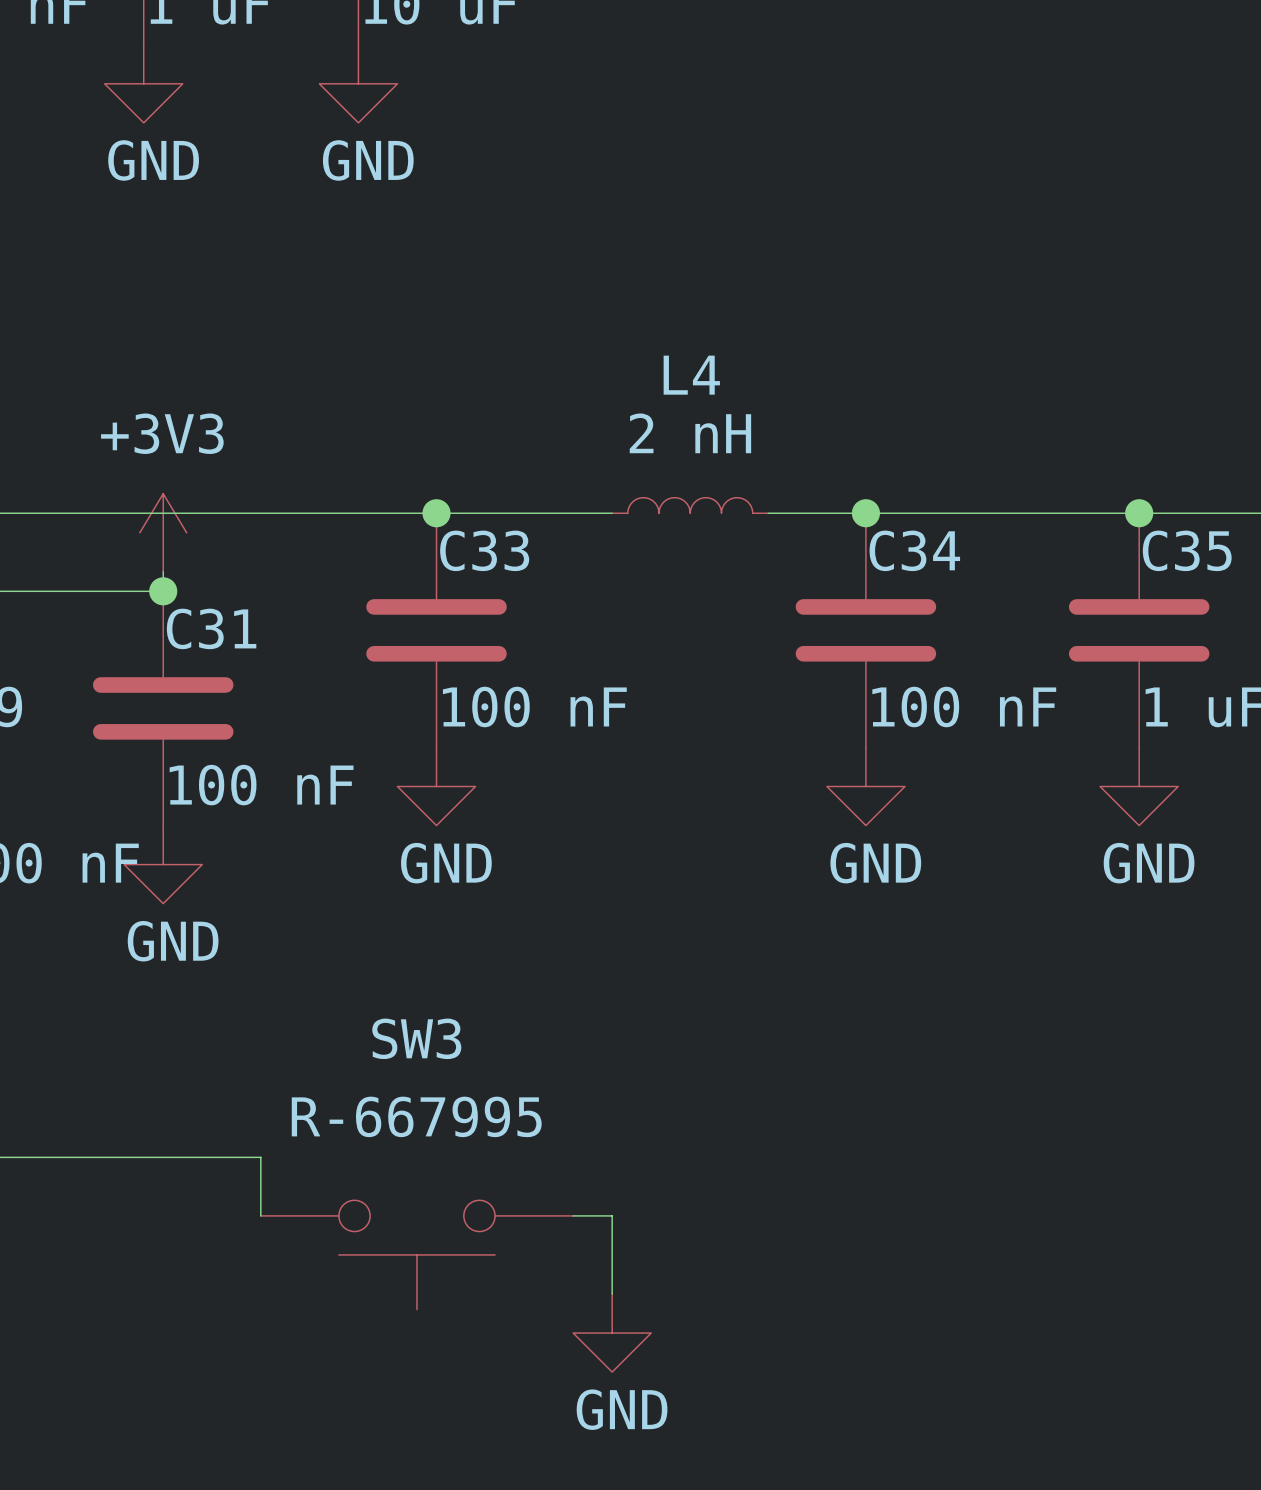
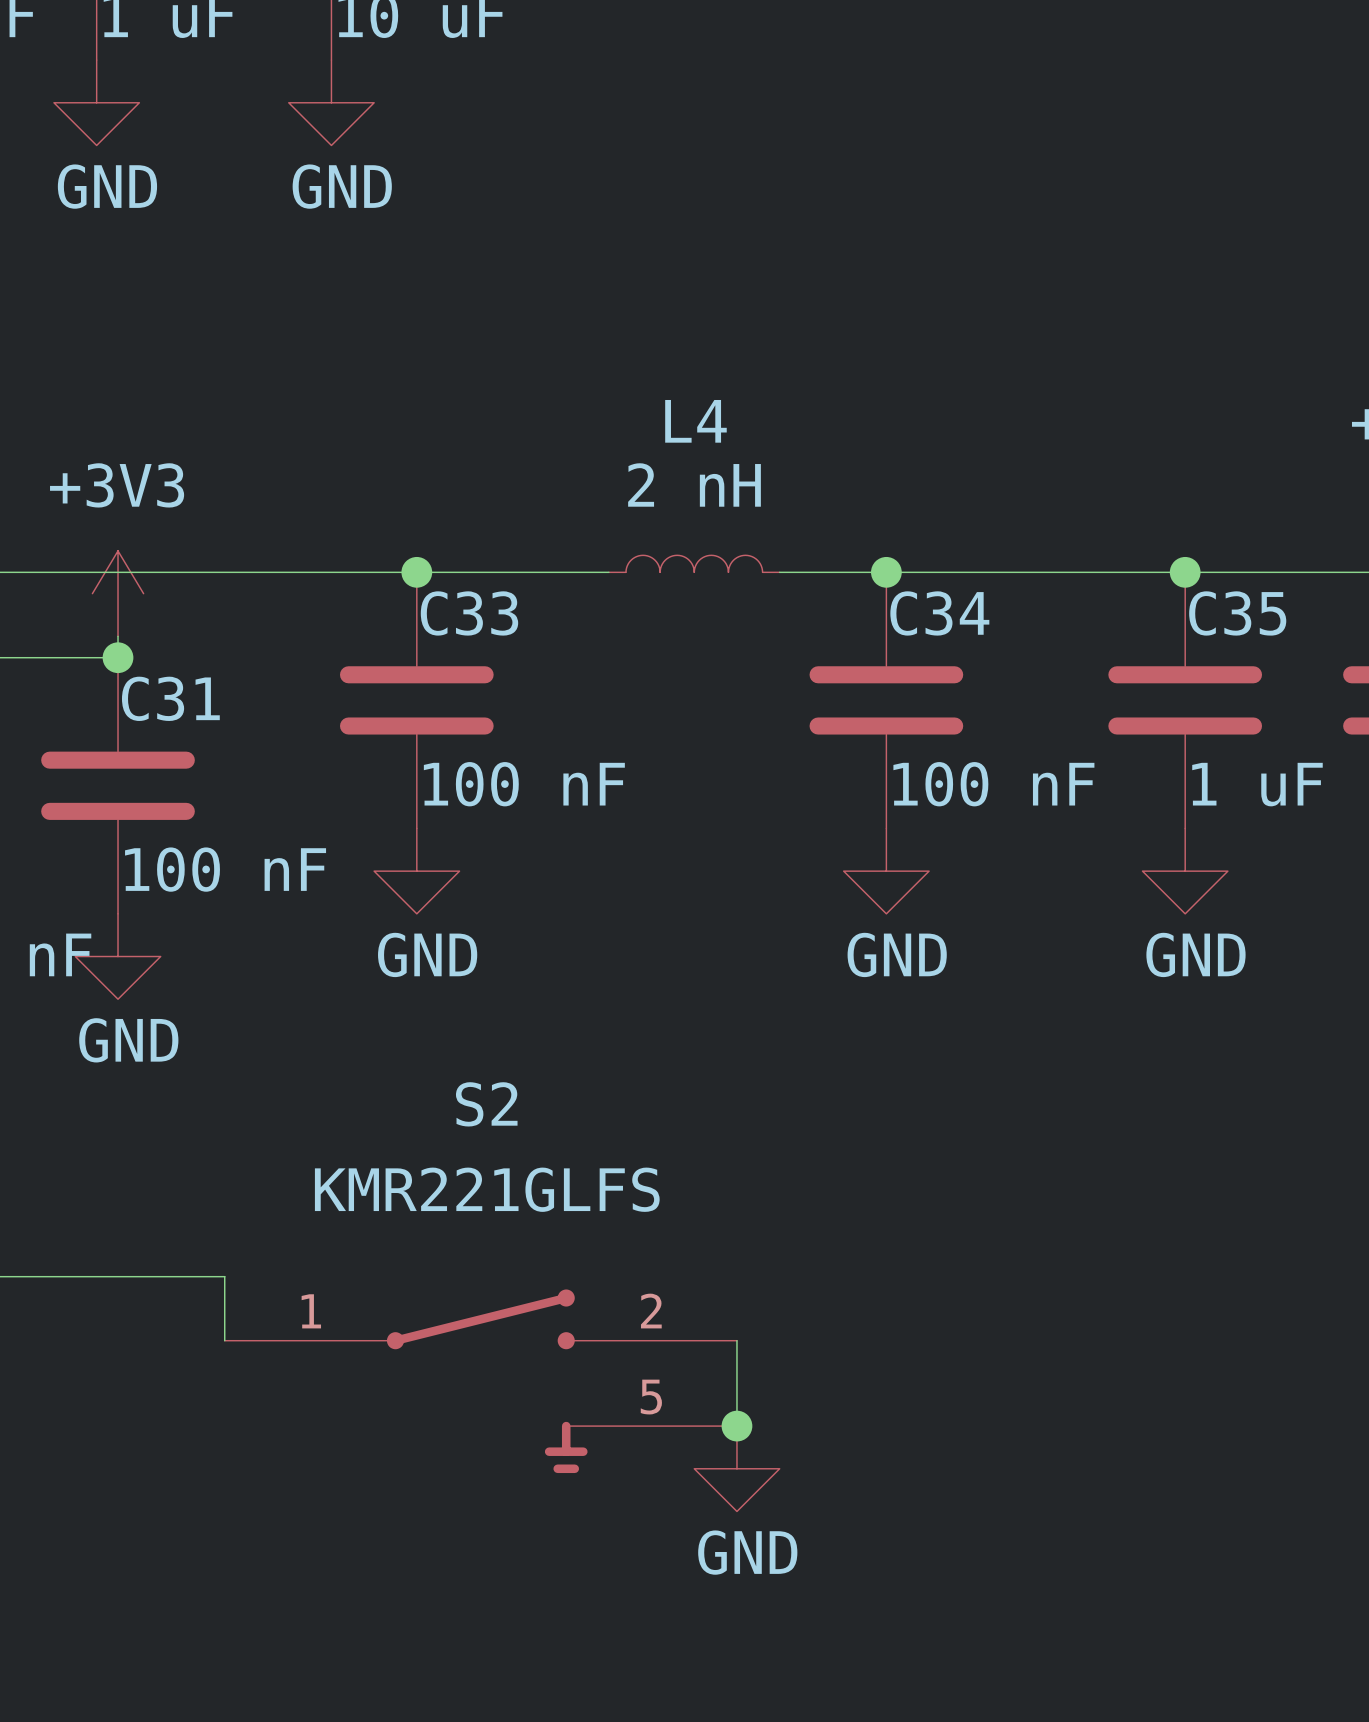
wire: (573, 1215) (612, 1215) (612, 1294) -> none
wire: none -> (736, 1340) (736, 1426)
S2: none -> KMR221GLFS (480, 1381)
SW3: R-667995 (416, 1254) -> none
junction: none -> (736, 1426)
power symbol position: GND (612, 1333) -> GND (736, 1468)

